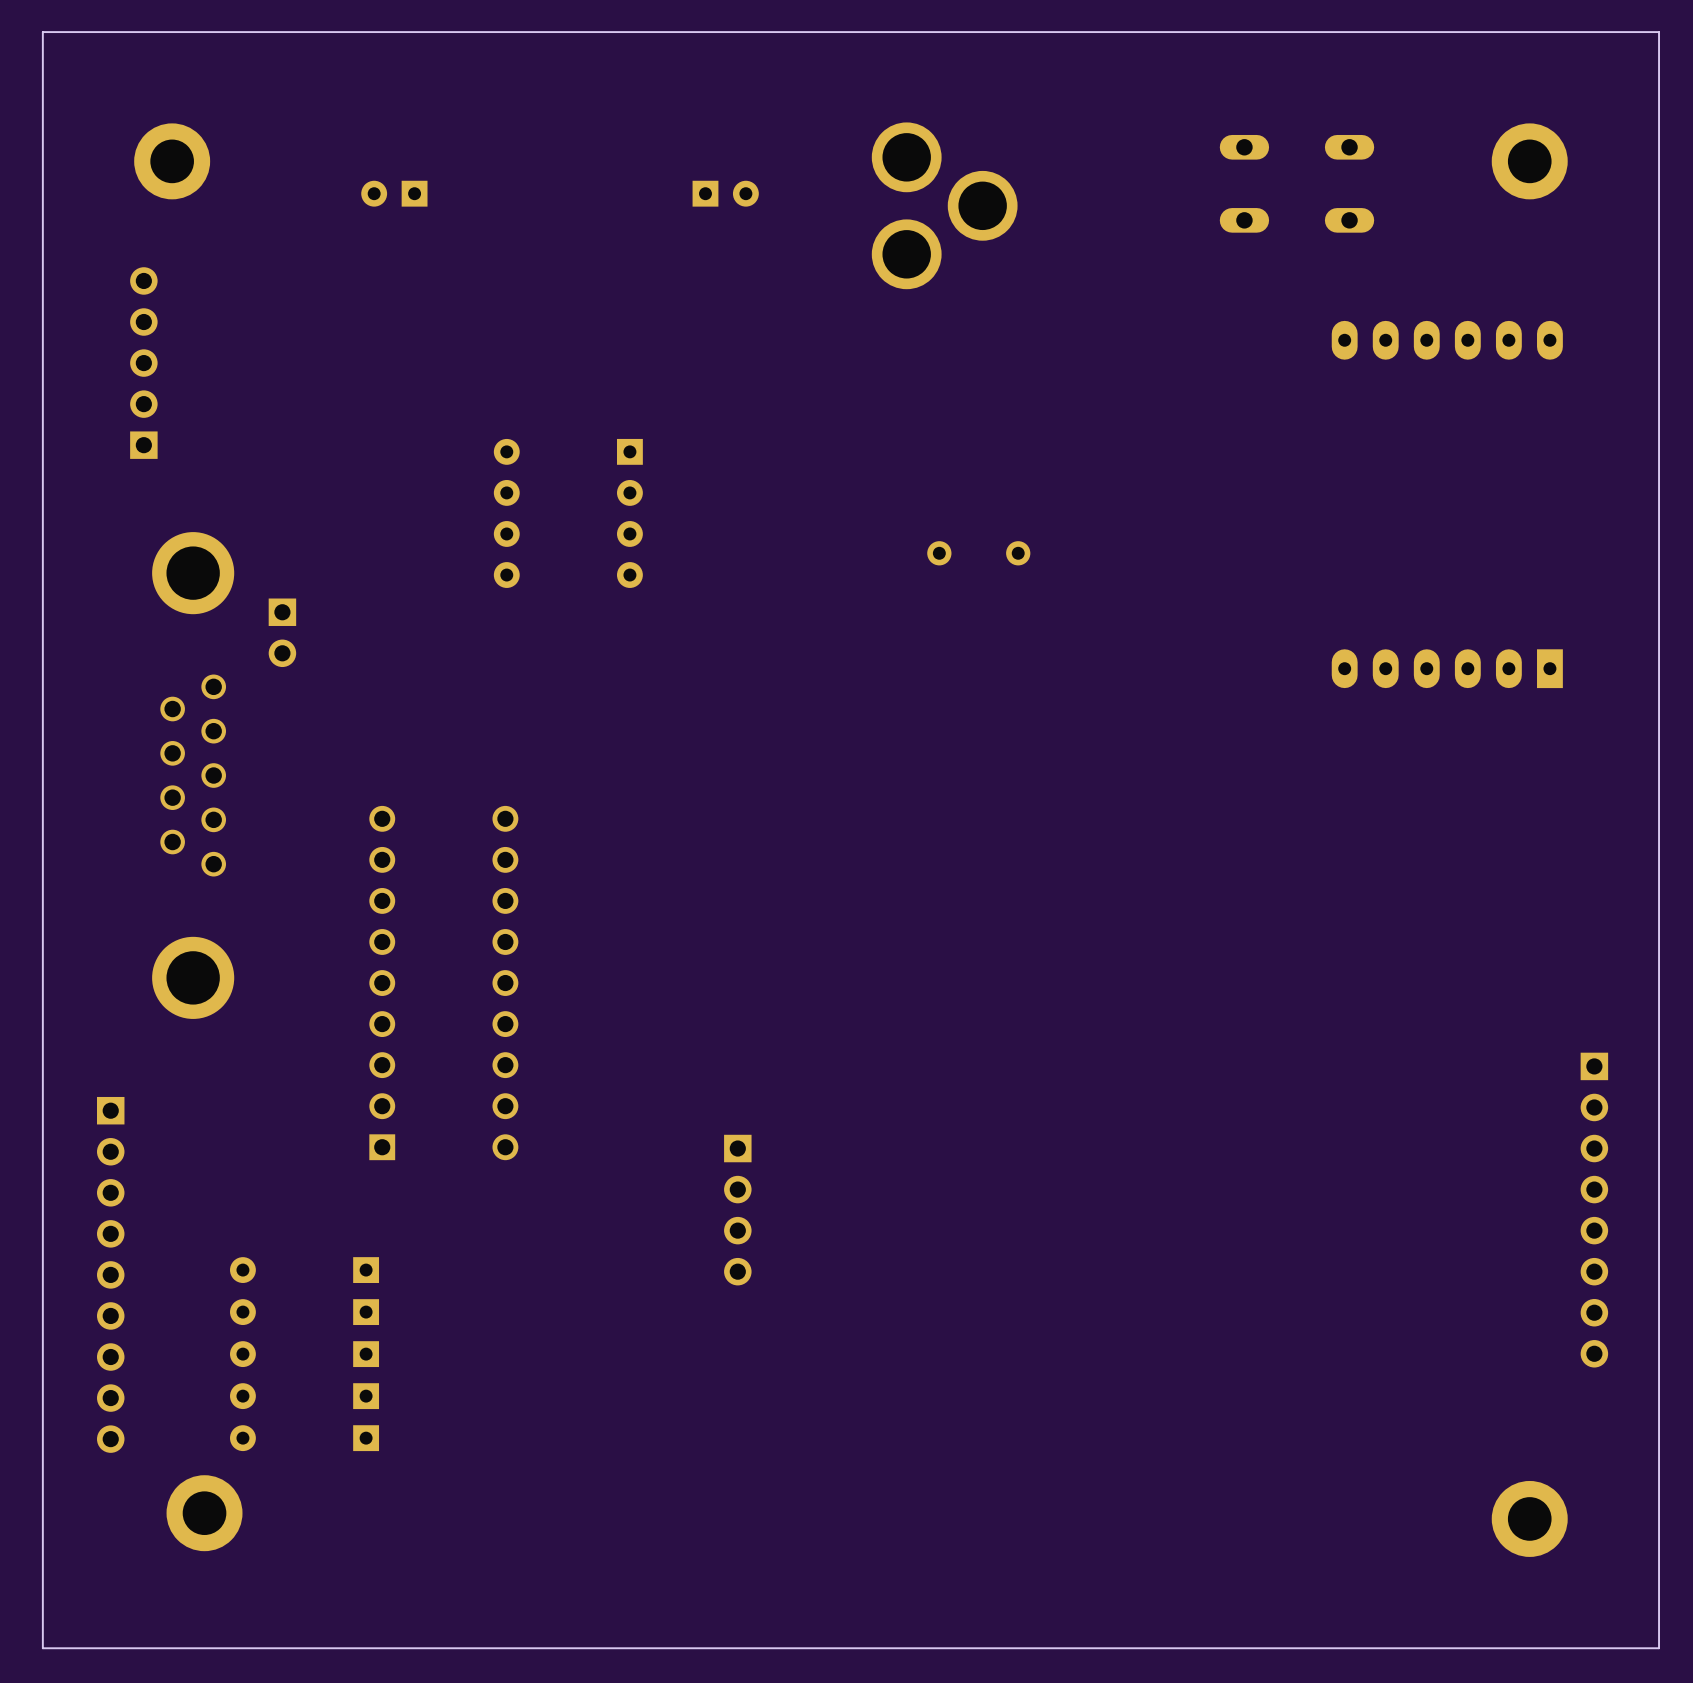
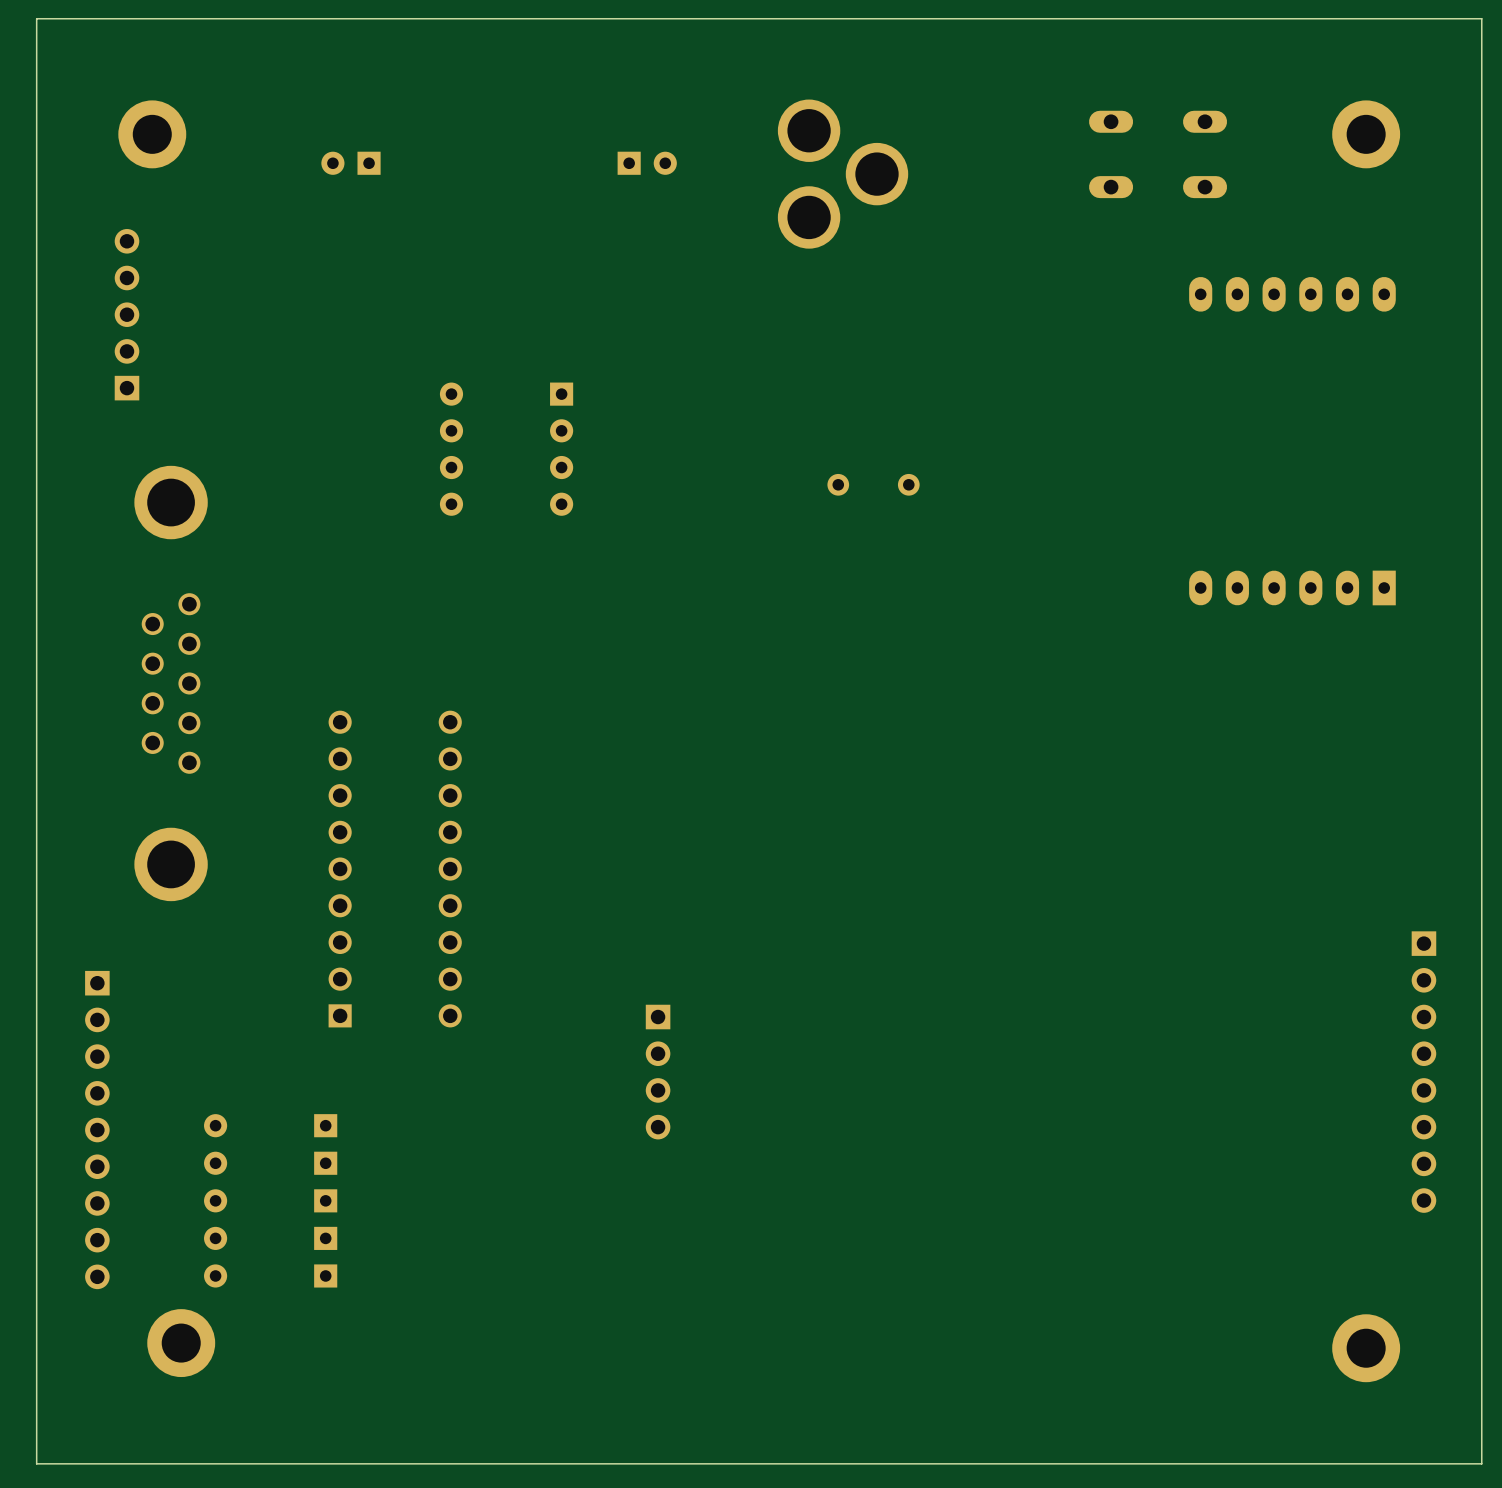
part: (282, 632) -> none

